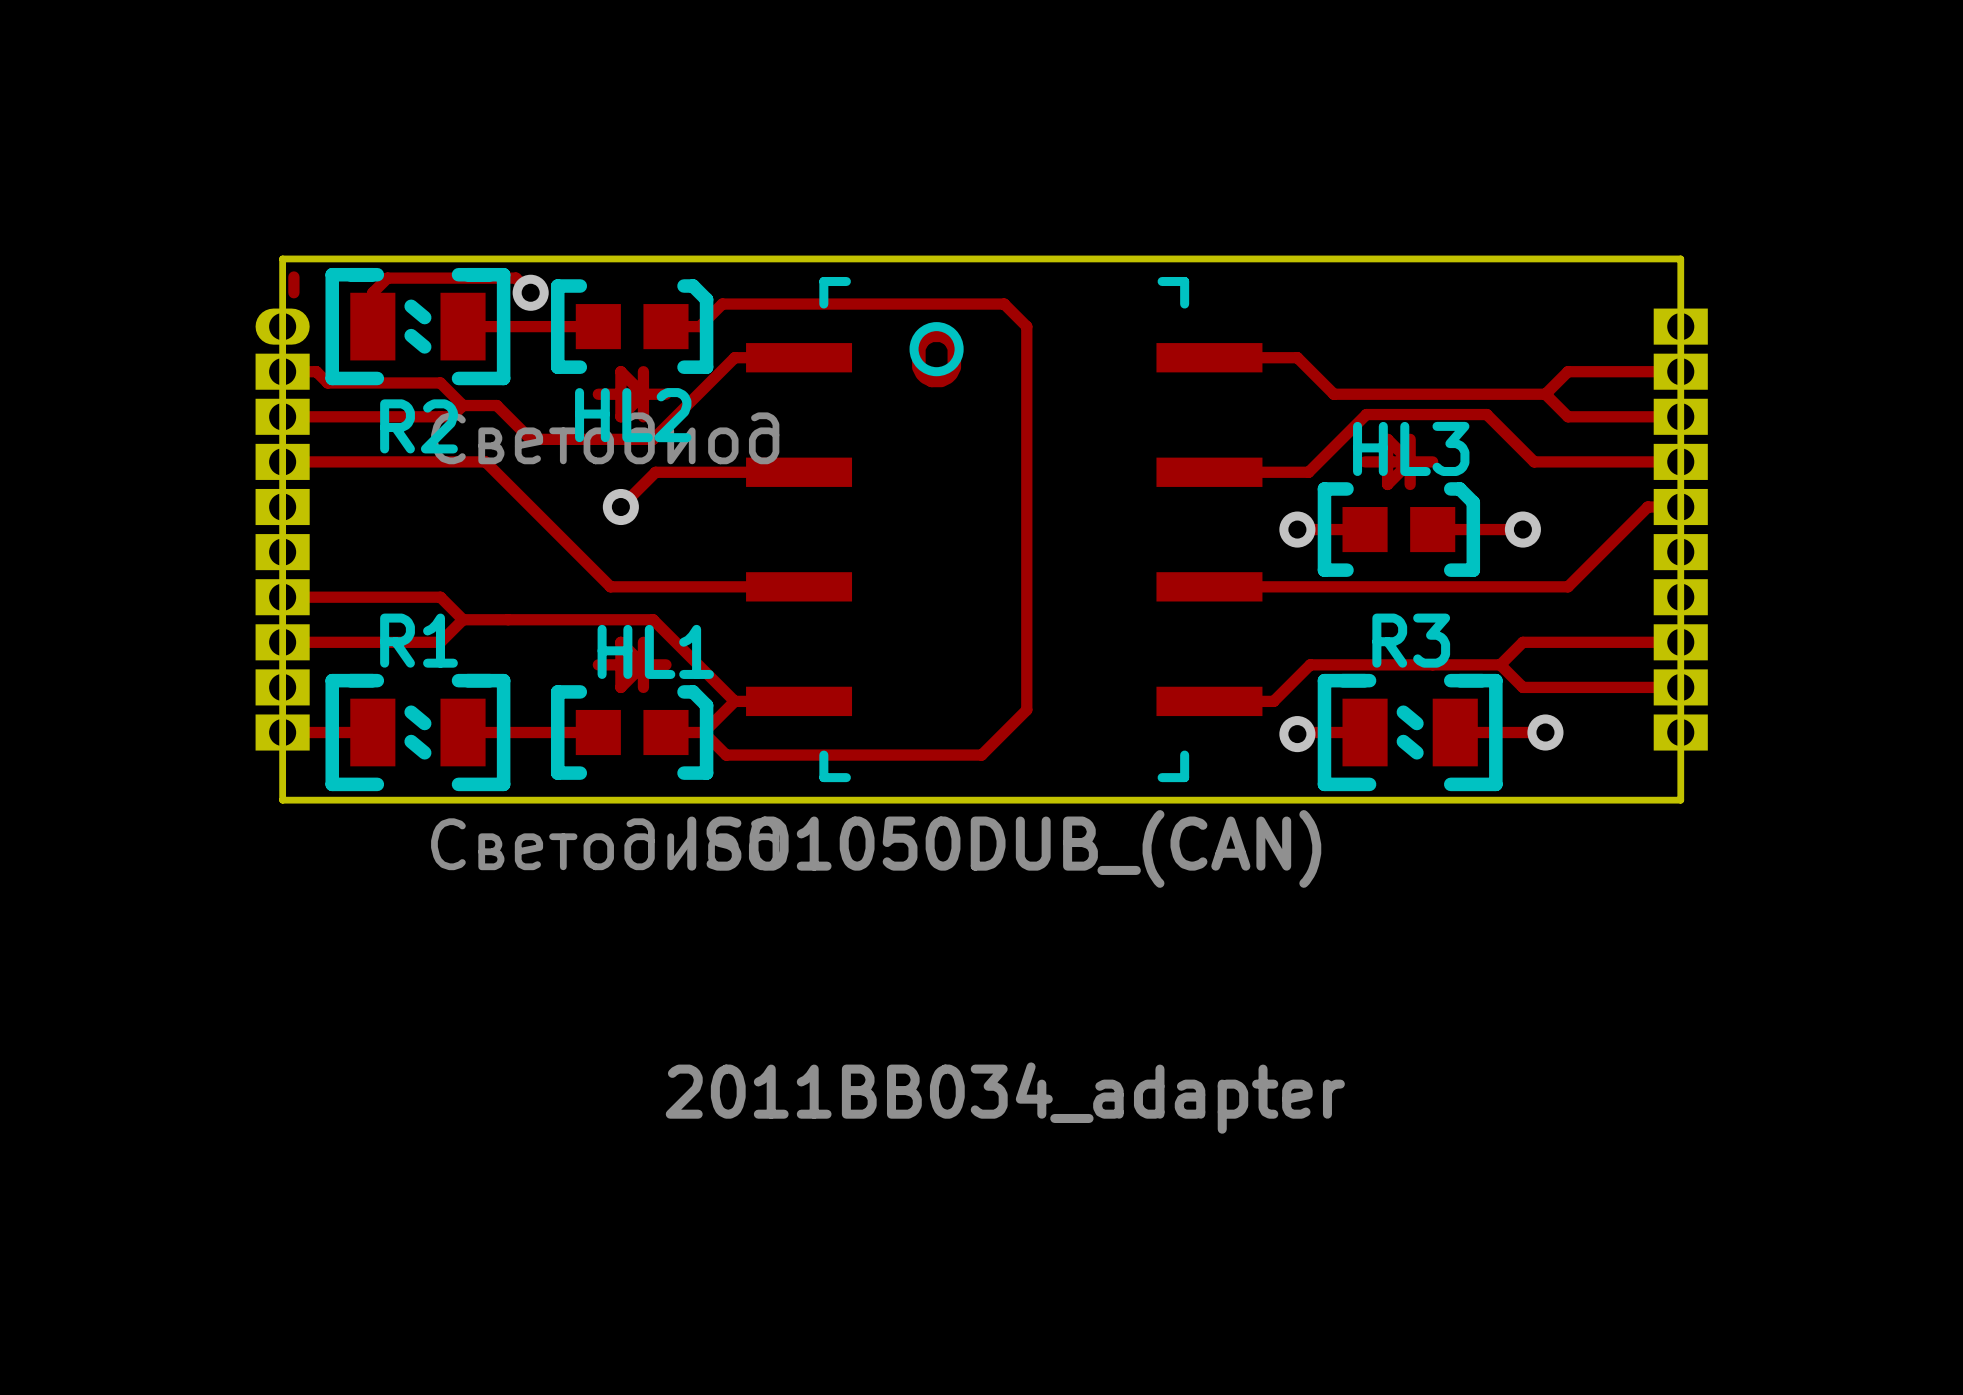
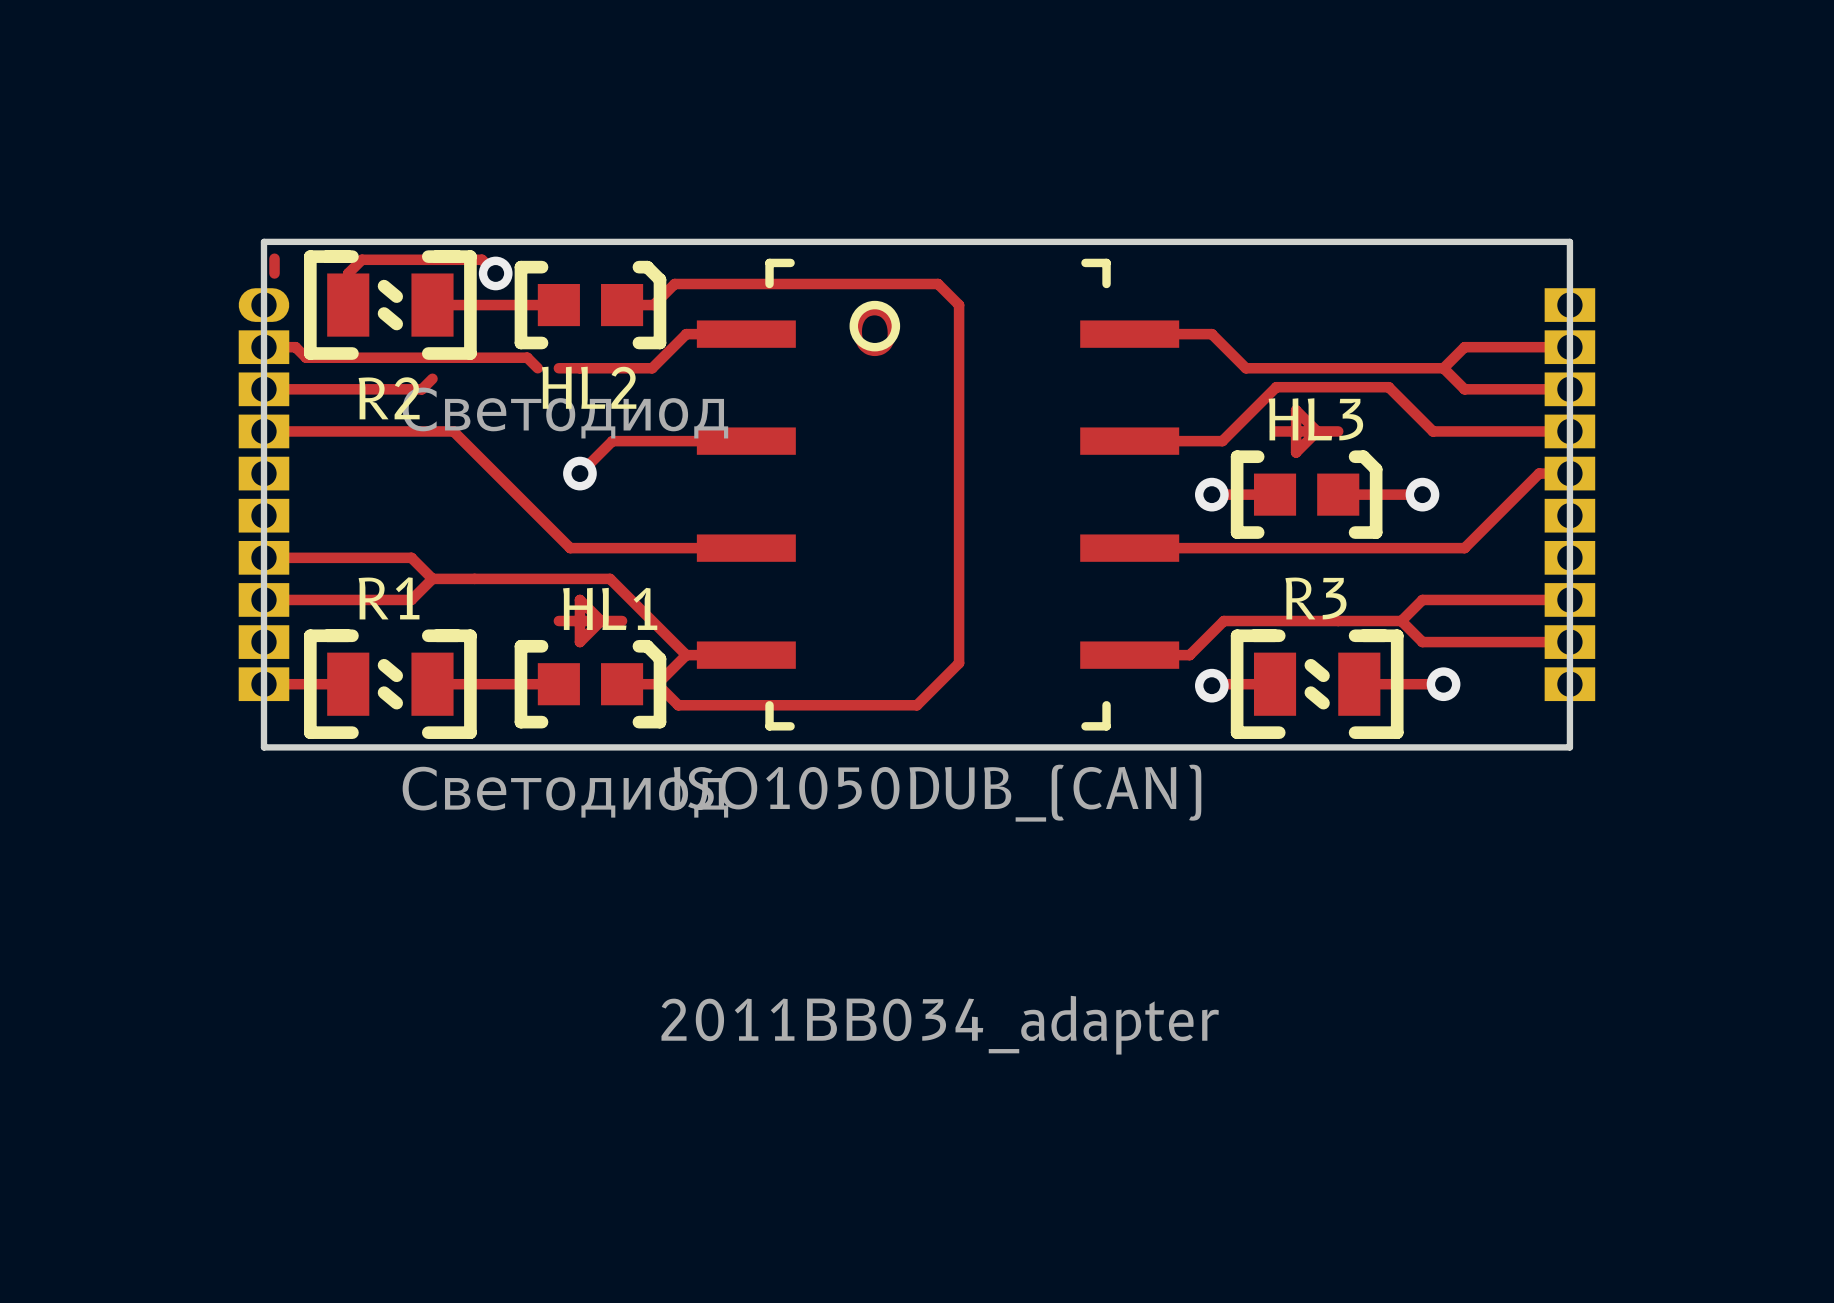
track: (620, 371) (620, 416) (643, 394) (620, 371) -> none
track: (643, 371) (643, 416) -> none
track: (440, 382) (463, 405) (496, 405) (530, 439) (653, 439) (698, 394) -> (411, 357) (527, 357) (537, 368)
track: none -> (622, 368) (652, 368)
track: (1410, 439) (1410, 484) -> none
track: (643, 642) (643, 687) -> none

